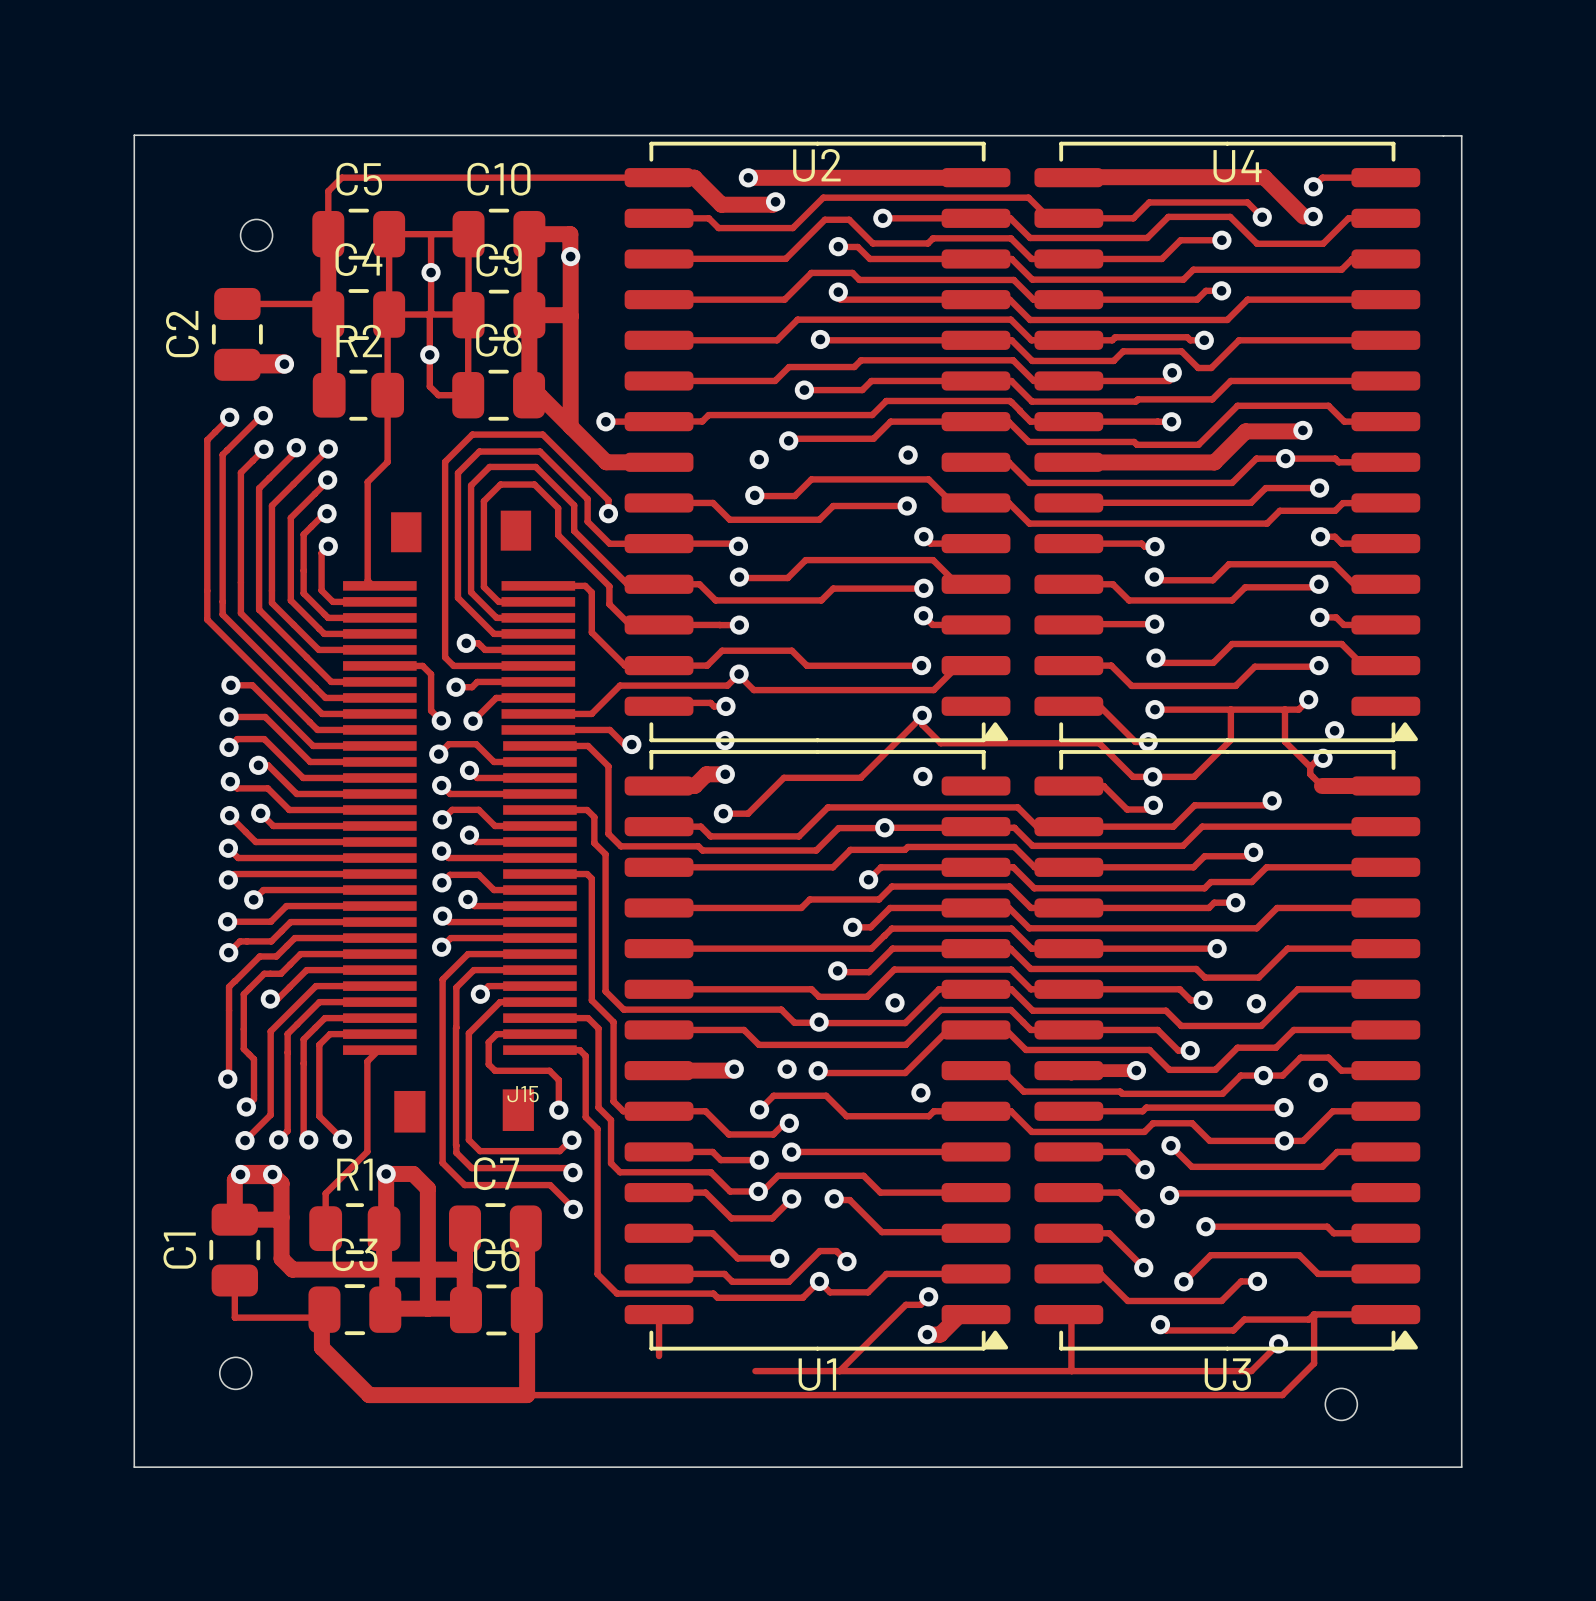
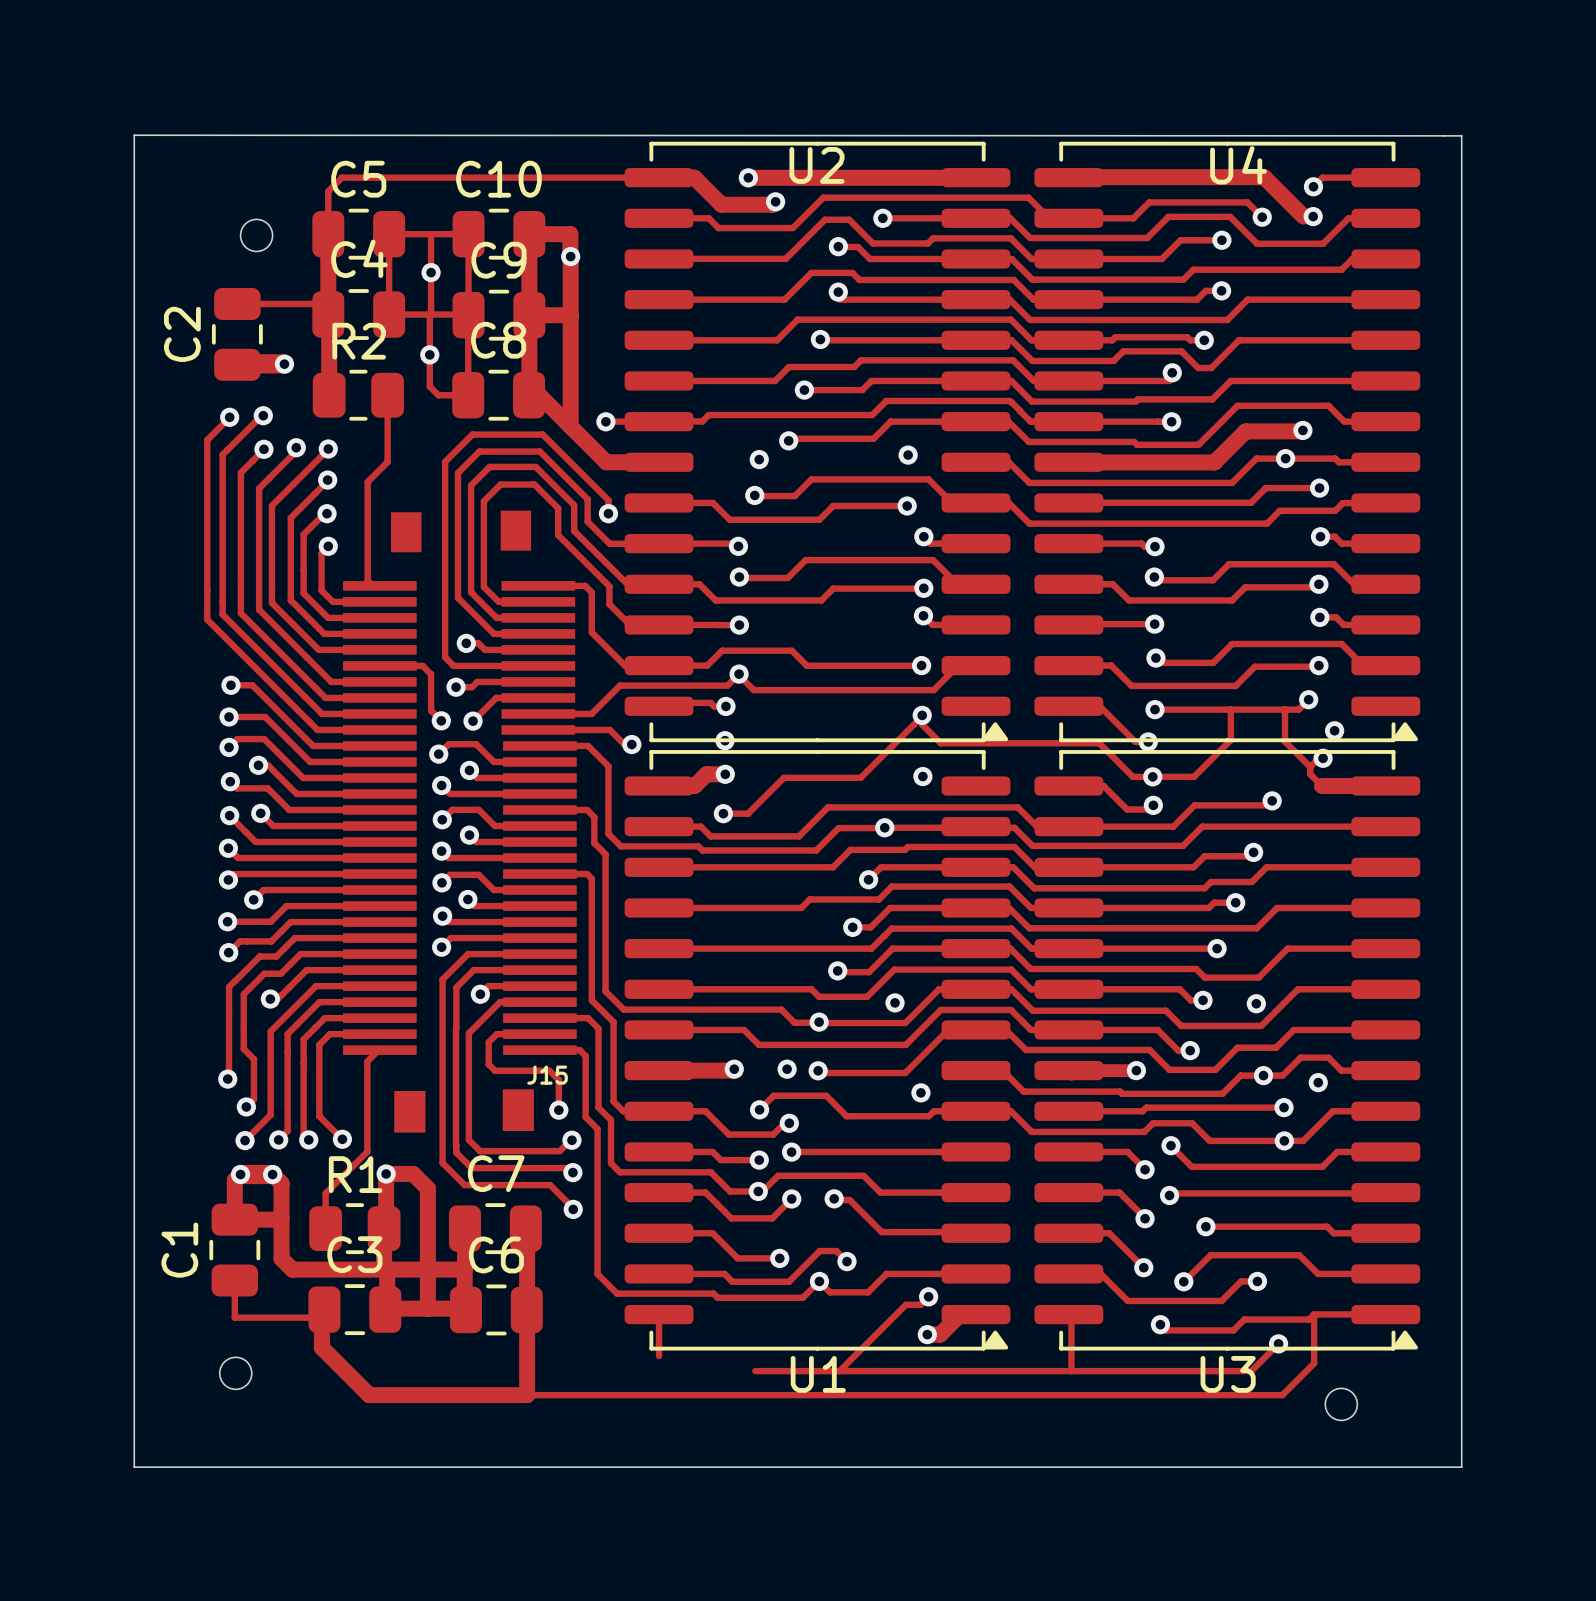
track: (387, 316) (387, 395) -> none
J15 name position: J15 (523, 1094) -> J15 (547, 1075)

